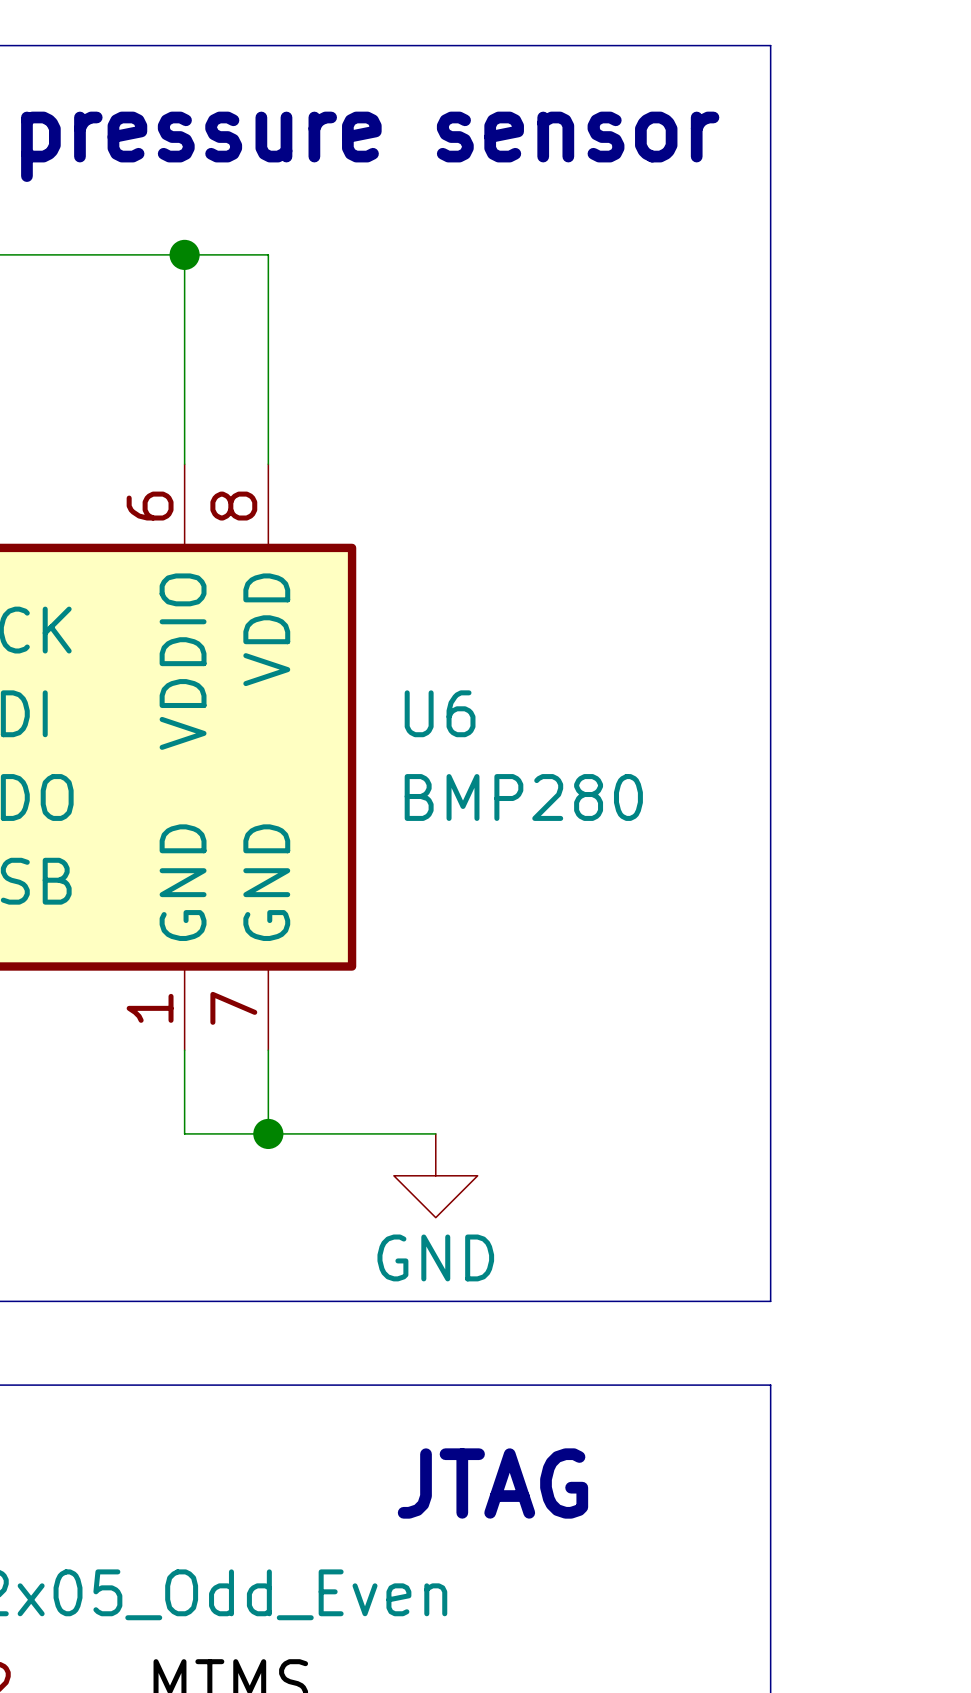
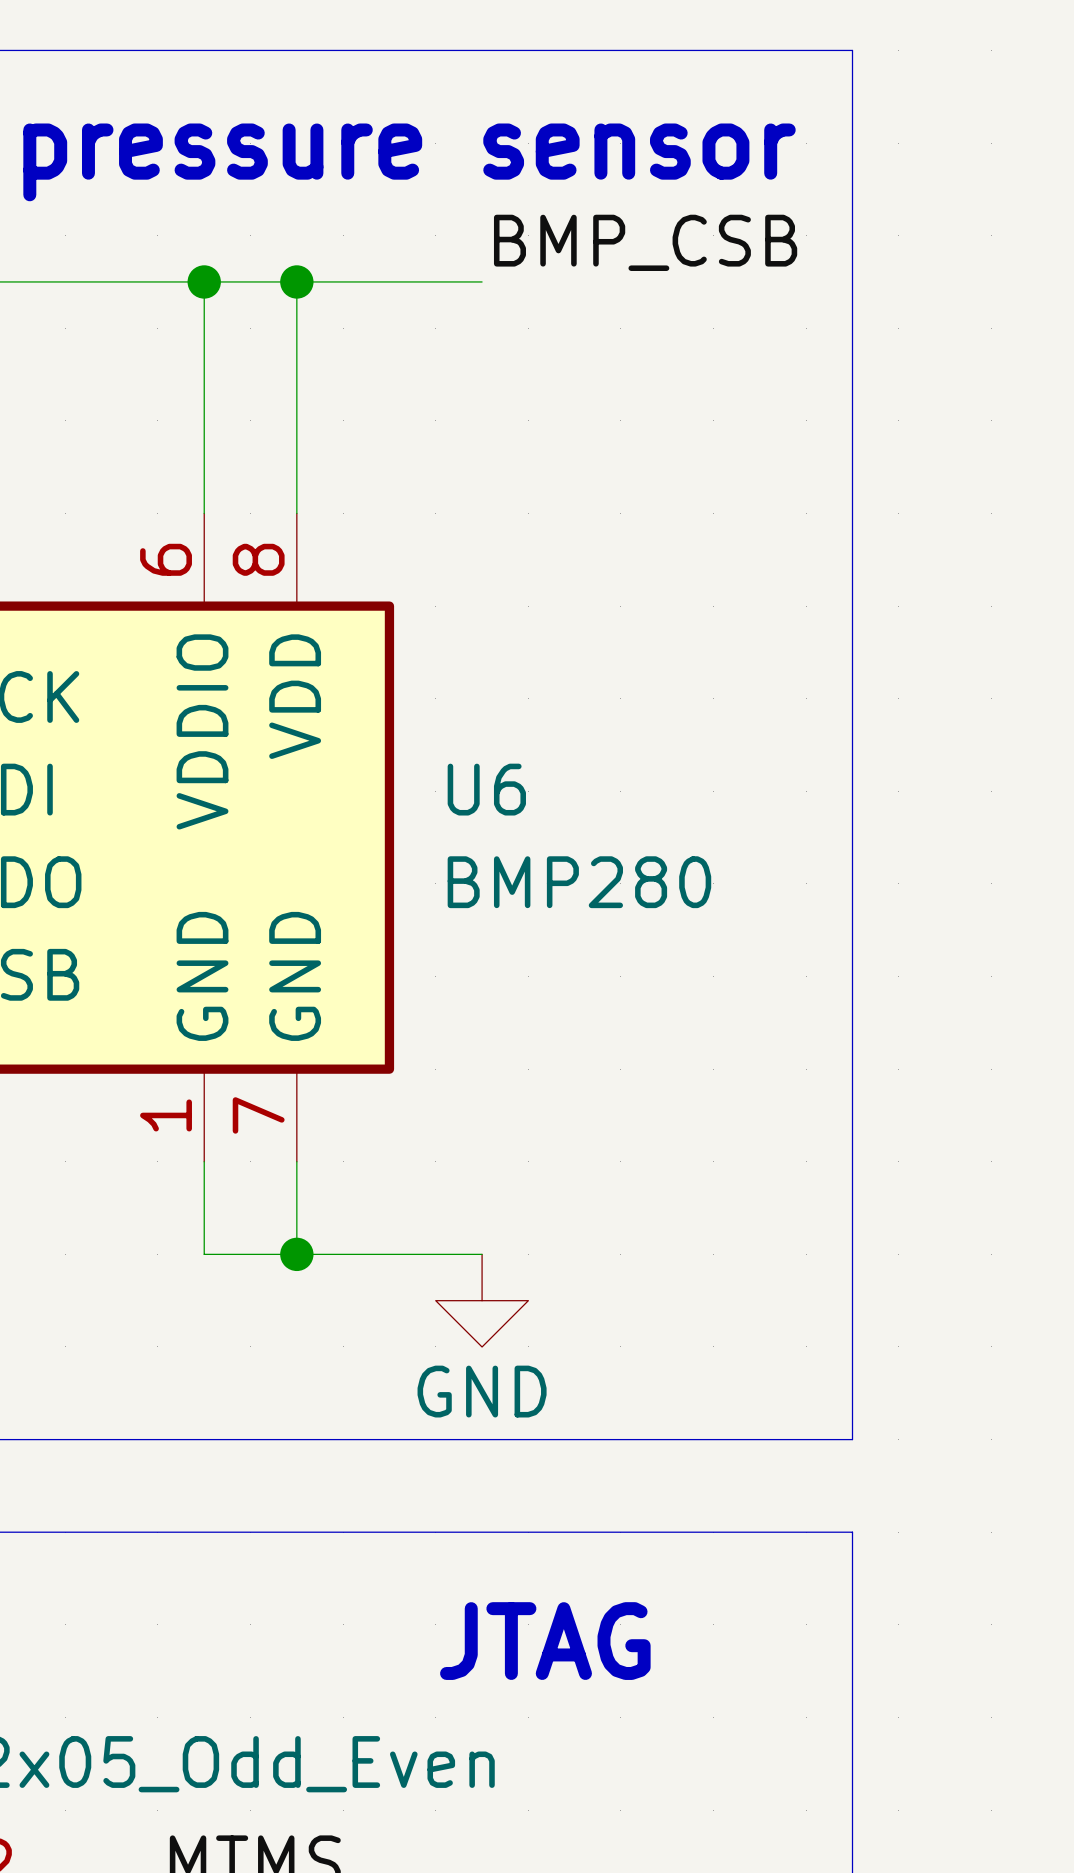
label: none -> BMP_CSB (645, 242)
wire: none -> (296, 281) (482, 281)
junction: none -> (296, 281)

